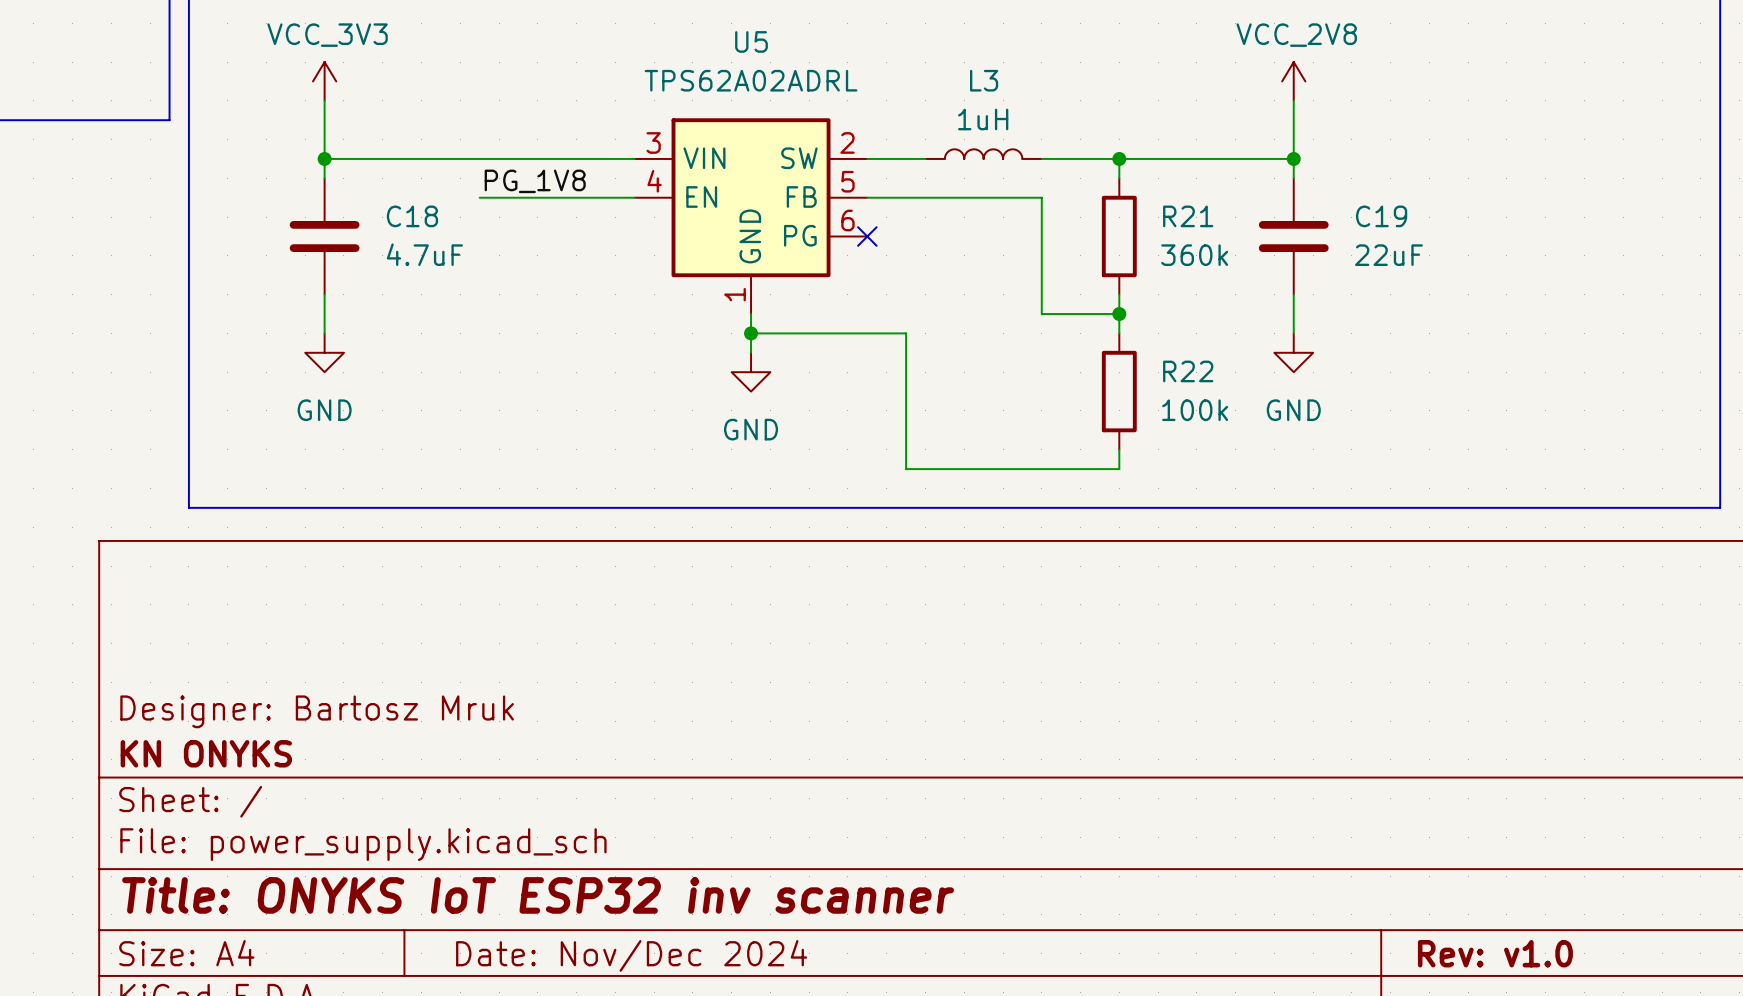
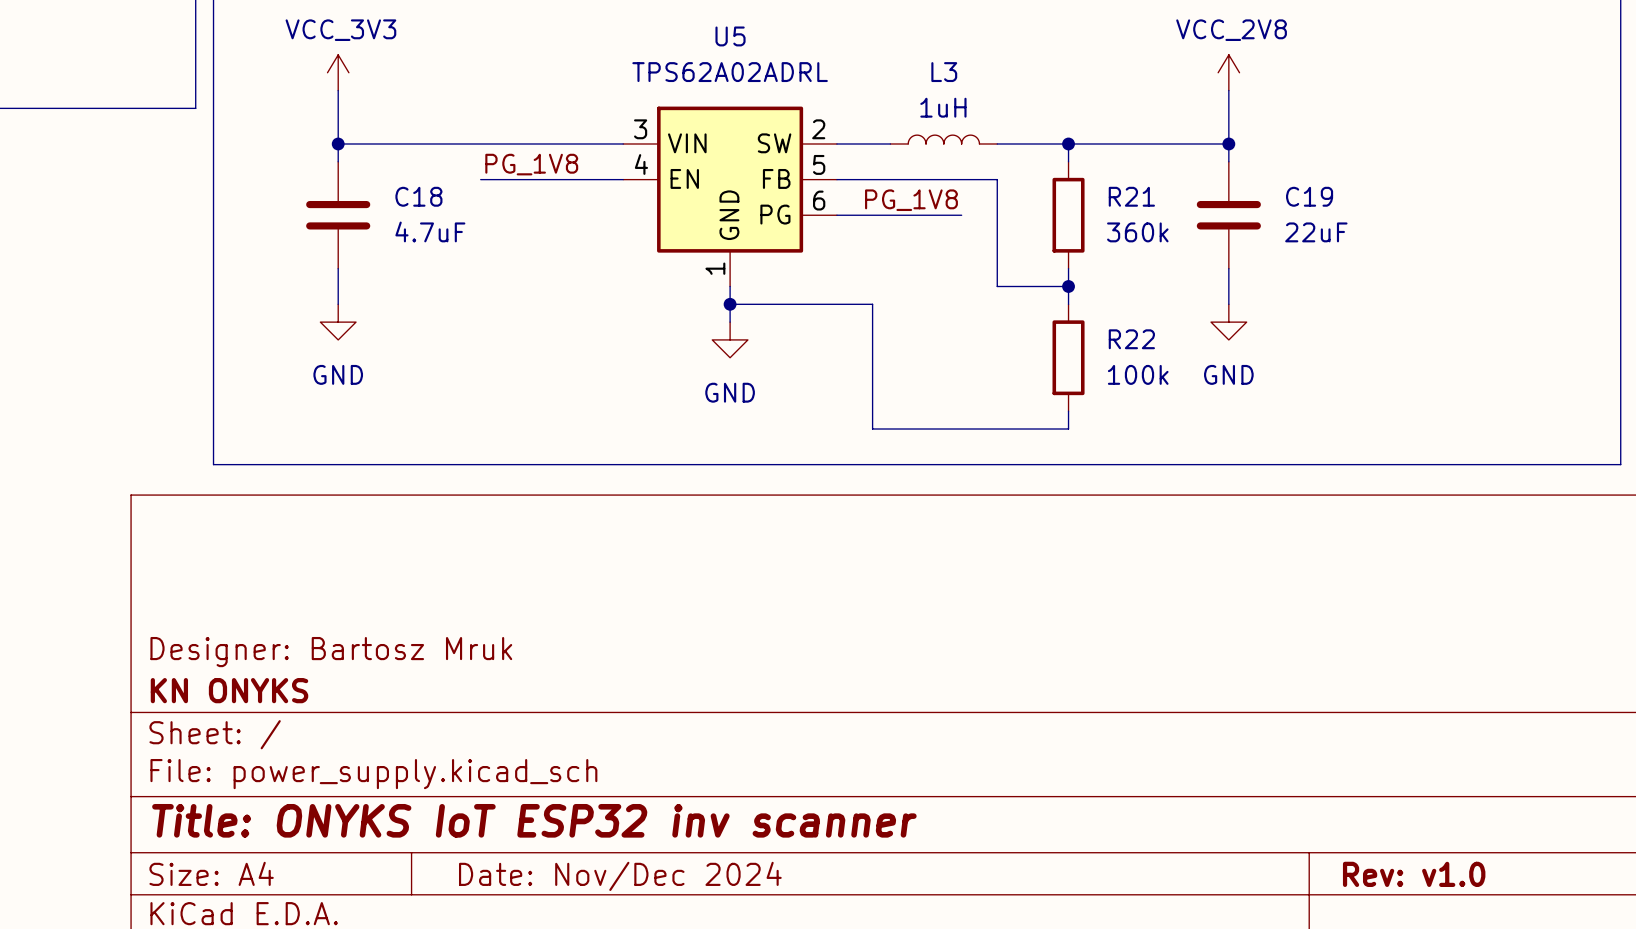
label: none -> PG_1V8 (911, 200)
wire: none -> (836, 215) (961, 215)
no-connect mark: (867, 236) -> none

